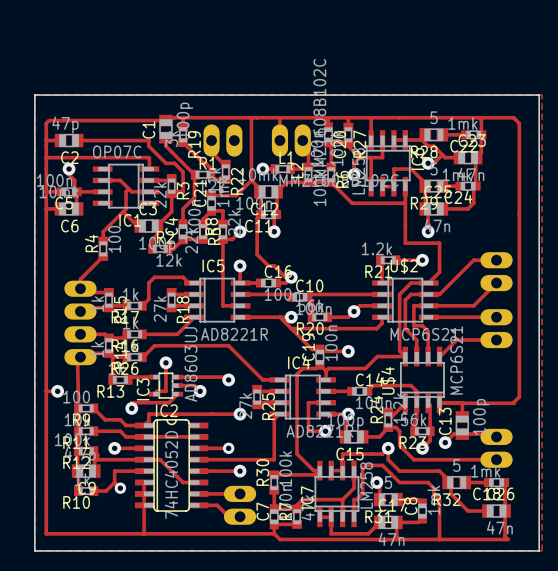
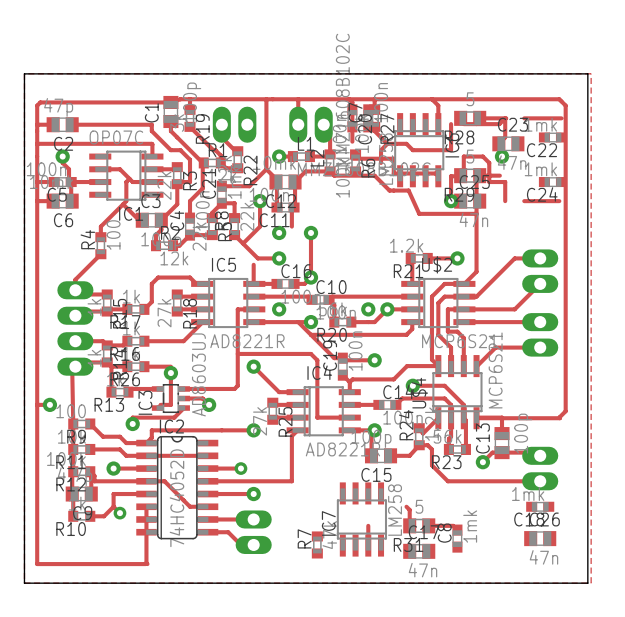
track: (371, 117) (371, 140) -> none
track: none -> (431, 99) (438, 105) (438, 124)
track: (479, 117) (481, 119) (481, 152) (475, 158) (473, 203) (468, 208) (442, 208) -> none
track: none -> (352, 109) (352, 141)
track: (425, 134) (420, 140) (393, 140) -> none
C22 position: (473, 134) -> (552, 137)
track: none -> (524, 118) (561, 118)
track: (421, 139) (428, 146) (433, 146) (445, 157) (459, 157) -> none
track: (382, 140) (382, 157) (376, 157) -> (451, 124) (451, 150) (412, 150) (406, 143)
track: none -> (463, 124) (499, 124) (505, 118) (505, 137) (502, 140) (502, 156)
track: (342, 142) (328, 142) (331, 145) (331, 167) -> none
track: (442, 154) (433, 163) (428, 163) -> none
track: (371, 157) (371, 186) -> none
via: (428, 163) -> none
via: none -> (502, 156)
track: none -> (352, 158) (393, 158) (393, 173) (435, 173) (438, 176)
via: (354, 174) -> none
track: (308, 182) (331, 182) (352, 203) (405, 203) -> (330, 171) (334, 175) (374, 175) (389, 190) (408, 190) (419, 213) (476, 213)
track: (382, 186) (393, 186) (393, 169) (411, 169) (425, 186) (428, 231) -> none
track: (405, 186) (405, 243) (439, 243) -> (476, 176) (476, 239)
C24 position: (468, 186) -> (552, 182)
track: none -> (260, 201) (260, 226) (243, 243)
via: none -> (260, 201)
track: none -> (451, 201) (451, 176) (463, 176) (463, 156) (482, 156) (489, 162) (489, 182) (505, 182) (505, 201)
via: none -> (451, 201)
track: none -> (524, 201) (559, 201)
track: (260, 214) (257, 218) (257, 254) (268, 265) (274, 265) (285, 277) (291, 277) -> (310, 232) (310, 277)
track: (240, 231) (232, 239) (222, 239) (222, 305) (225, 305) -> none
via: (240, 231) -> none
via: (274, 231) -> none
via: (428, 231) -> none
via: none -> (279, 232)
via: none -> (310, 232)
track: none -> (234, 235) (257, 258) (279, 258)
via: none -> (279, 258)
via: (240, 265) -> none
via: none -> (279, 309)
via: none -> (368, 309)
via: none -> (387, 309)
via: (354, 311) -> none
track: (225, 345) (154, 345) (143, 357) -> (170, 366) (145, 366)
track: (228, 345) (240, 357) -> (240, 353) (310, 353) (317, 360) (317, 385)
track: (319, 364) (316, 368) (302, 368) (297, 374) -> none
track: none -> (412, 385) (444, 385) (463, 404) (463, 418)
via: none -> (412, 385)
track: (177, 377) (225, 377) (228, 379) -> (183, 388) (234, 388) (237, 385) (237, 309)
via position: (228, 379) -> (253, 366)
track: (297, 402) (297, 454) (313, 470) (319, 470) (315, 474) (274, 474) -> none
track: (308, 402) (308, 431) (325, 431) -> (330, 417) (317, 417)
via: (325, 431) -> none
track: (430, 431) (430, 440) (422, 448) -> none
via: (388, 448) -> none
via: (422, 448) -> none
track: (331, 470) (342, 470) (342, 454) (382, 454) (388, 448) (388, 459) (399, 471) (439, 471) (448, 479) (450, 485) (450, 493) (468, 511) (488, 511) -> none
track: (354, 470) (354, 488) (342, 499) (302, 499) (297, 505) (297, 509) (274, 509) (274, 490) -> none
R30: 100k (274, 482) -> none
via: (376, 482) -> none
R32: 5 (456, 482) -> none
track: (465, 482) (488, 482) -> none
track: (504, 482) (505, 536) (507, 539) (279, 539) (274, 533) -> none
C7 position: (274, 516) -> (368, 118)
track: (319, 517) (331, 517) (331, 533) (368, 533) (379, 522) -> none
track: (354, 517) (354, 499) (356, 499) (362, 493) (362, 468) (365, 465) (382, 465) (399, 482) (428, 482) (433, 488) (433, 493) (439, 499) (439, 539) -> none
track: (422, 518) (418, 522) (396, 522) (396, 536) (393, 539) -> none
track: (297, 524) (274, 524) (274, 533) -> none
track: (144, 533) (274, 533) -> none

